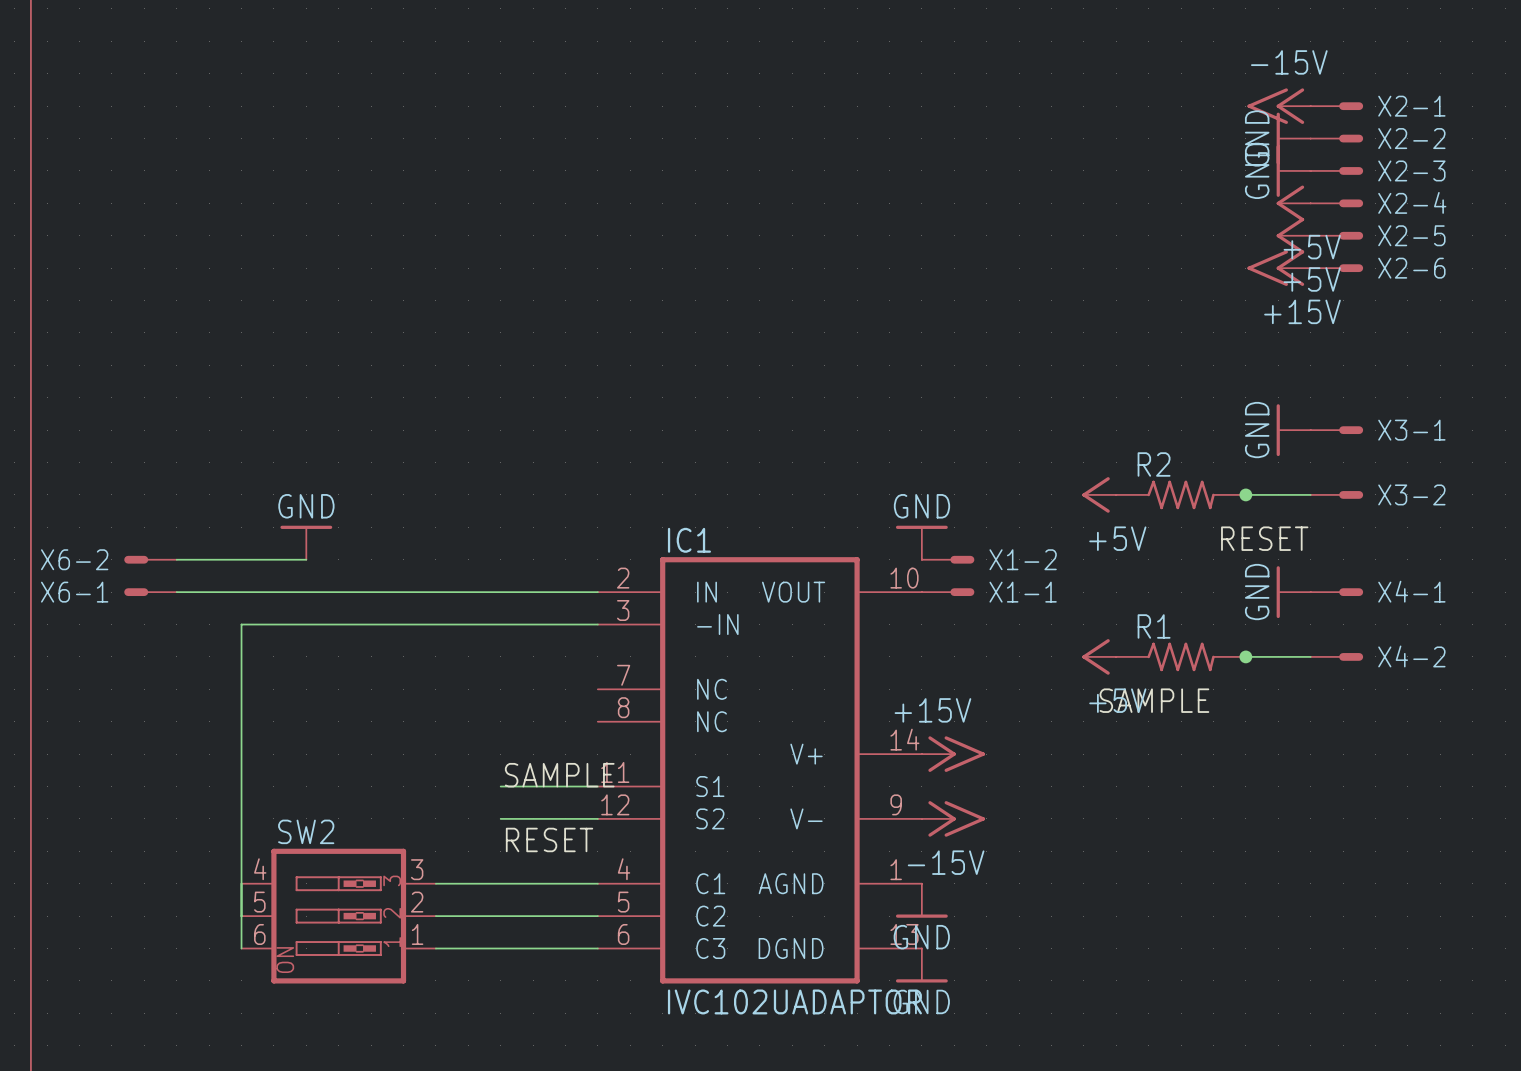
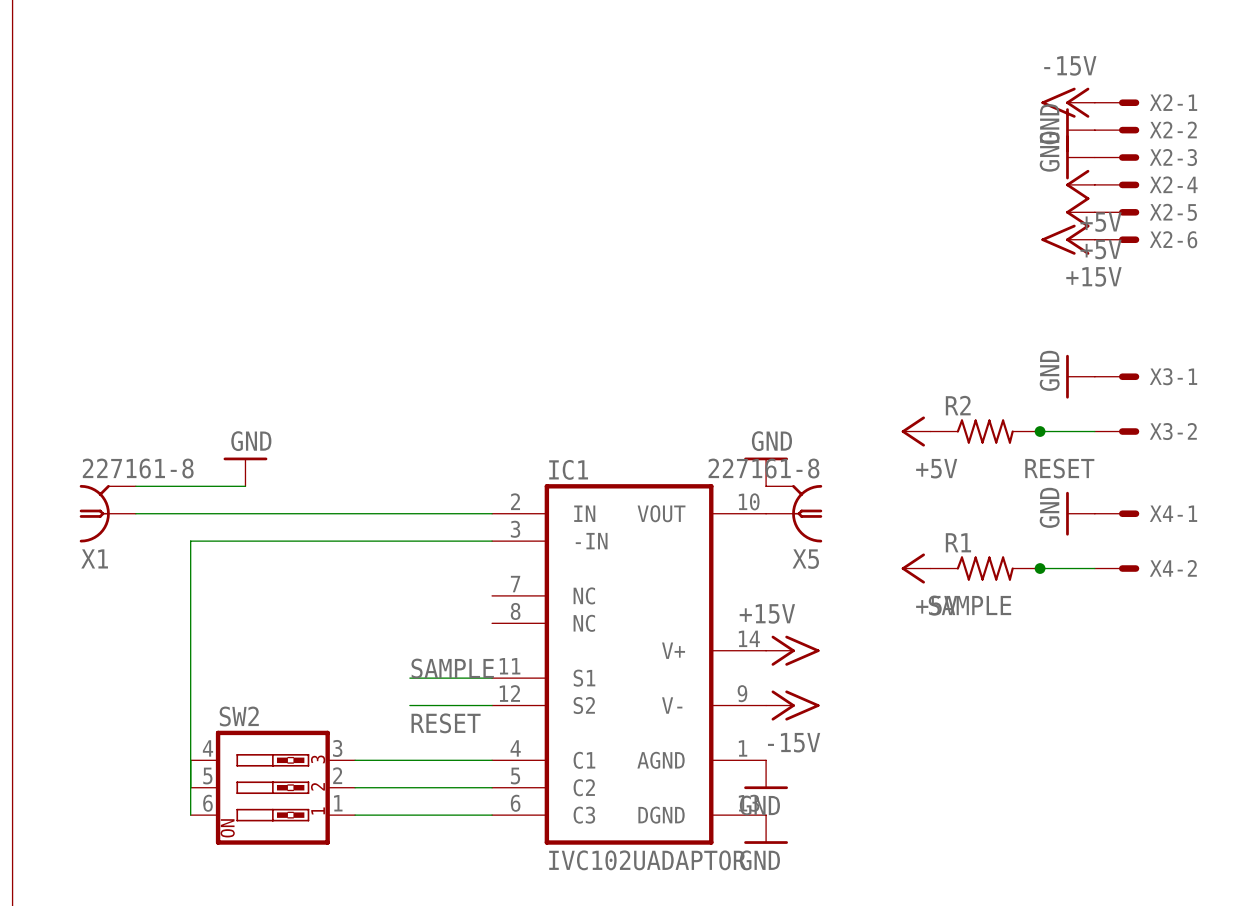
X6-2: (150, 559) -> none
X1-2: (948, 559) -> none
X1: none -> 227161-8 (107, 513)
X6-1: (150, 592) -> none
X1-1: (948, 592) -> none
X5: none -> 227161-8 (794, 513)

